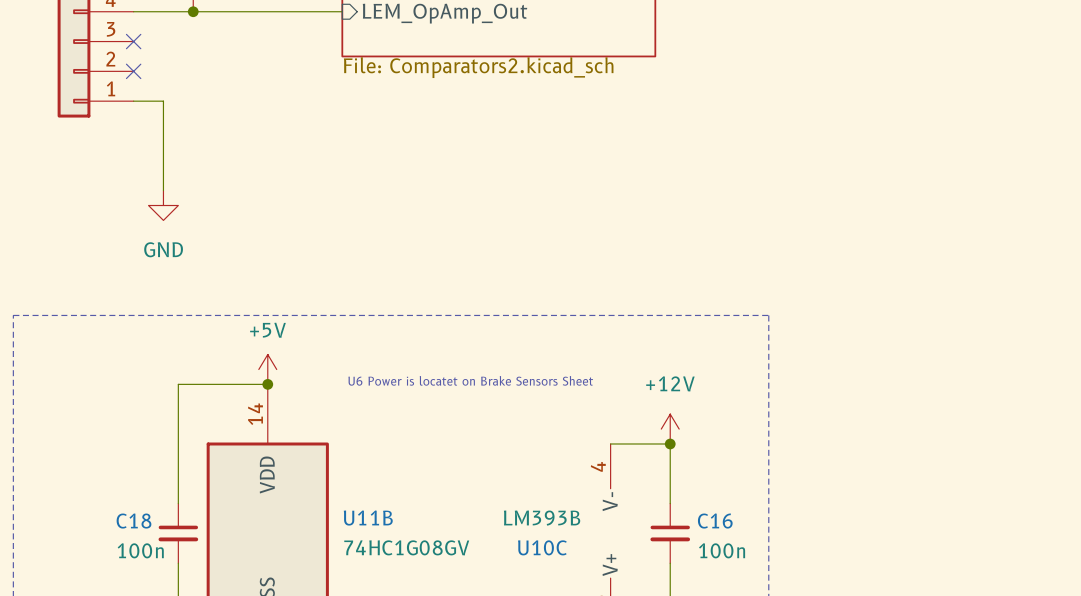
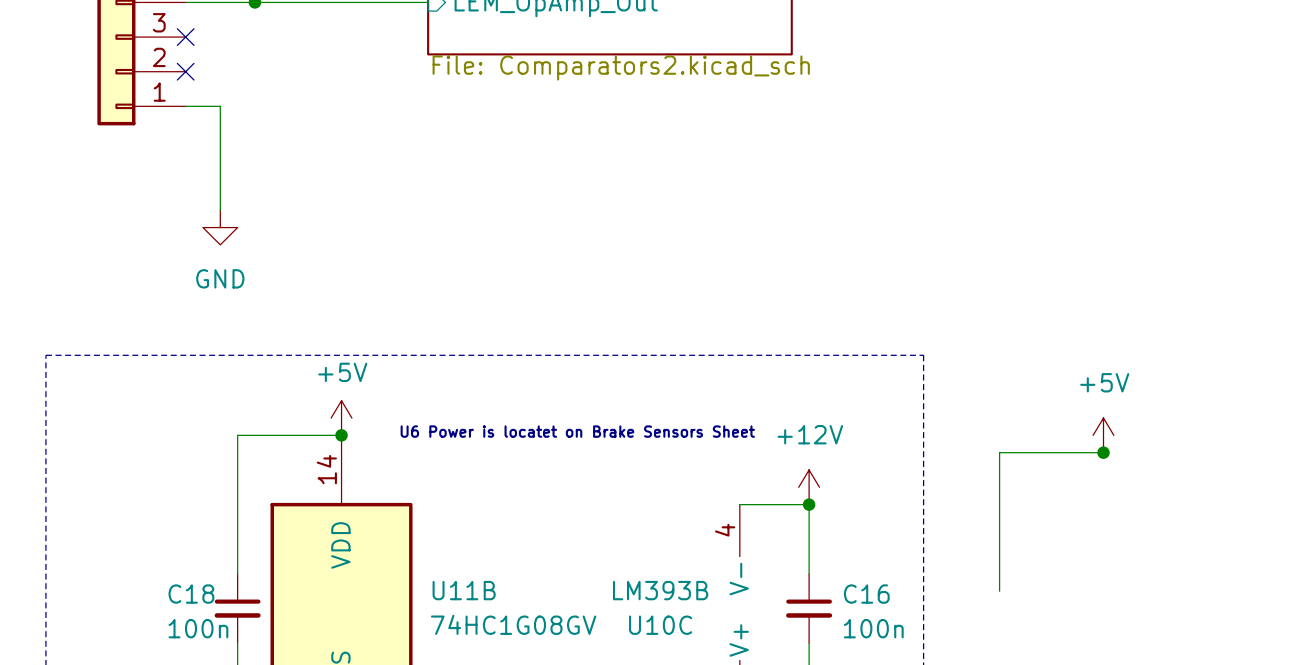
power symbol: none -> +5V (1103, 435)
wire: none -> (1103, 452) (999, 452) (999, 591)
junction: none -> (1103, 452)

